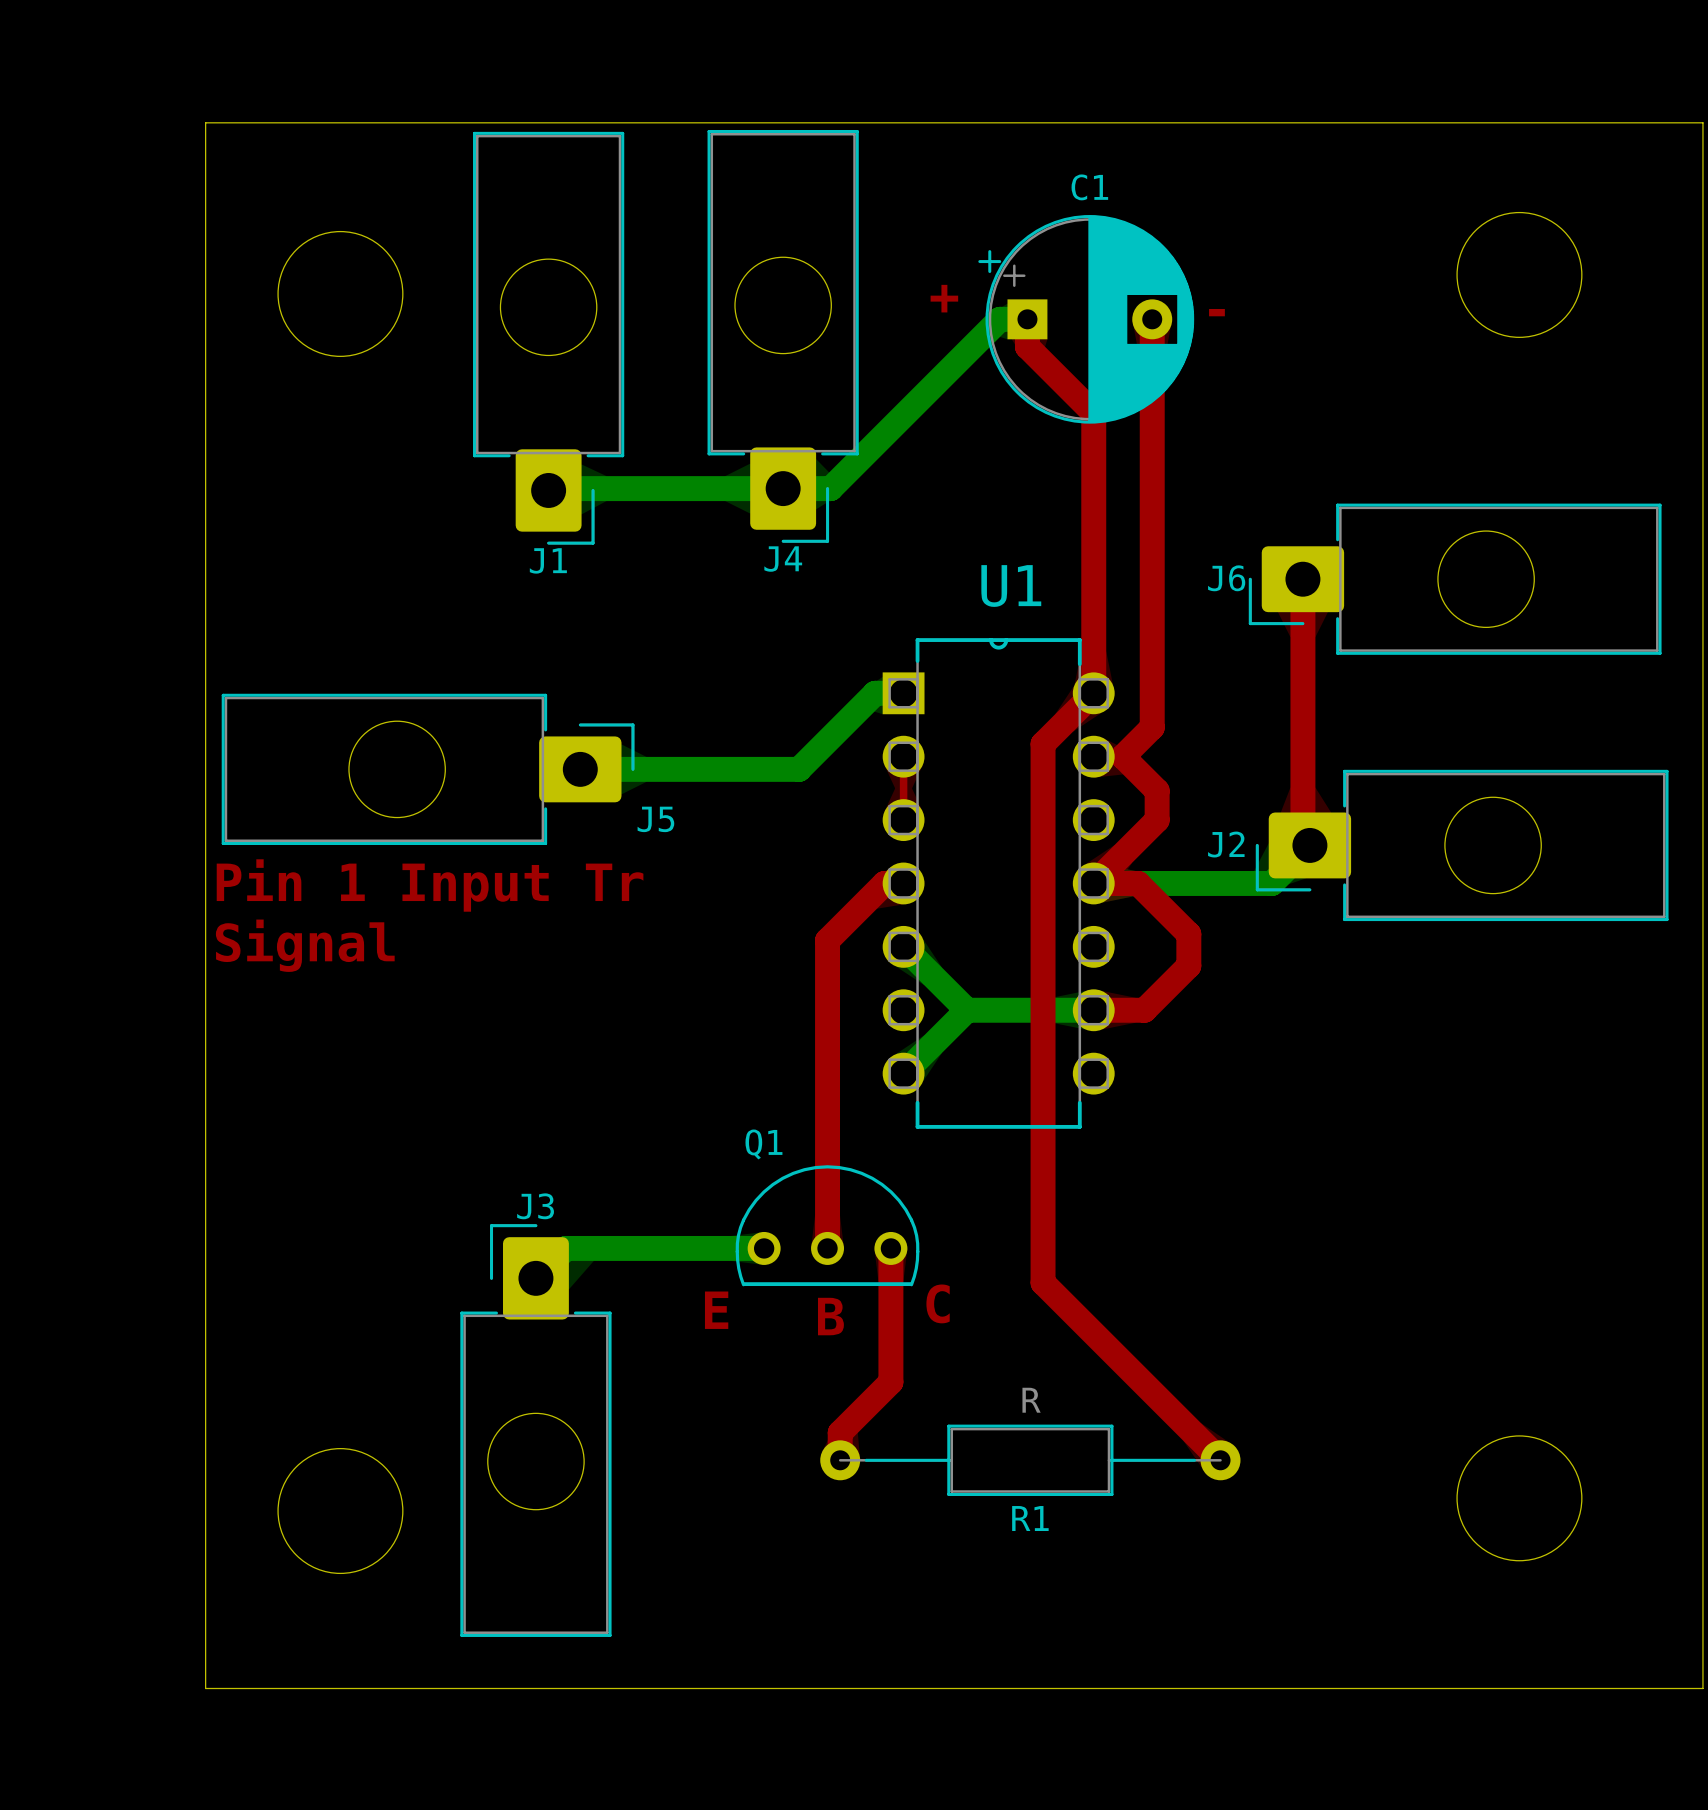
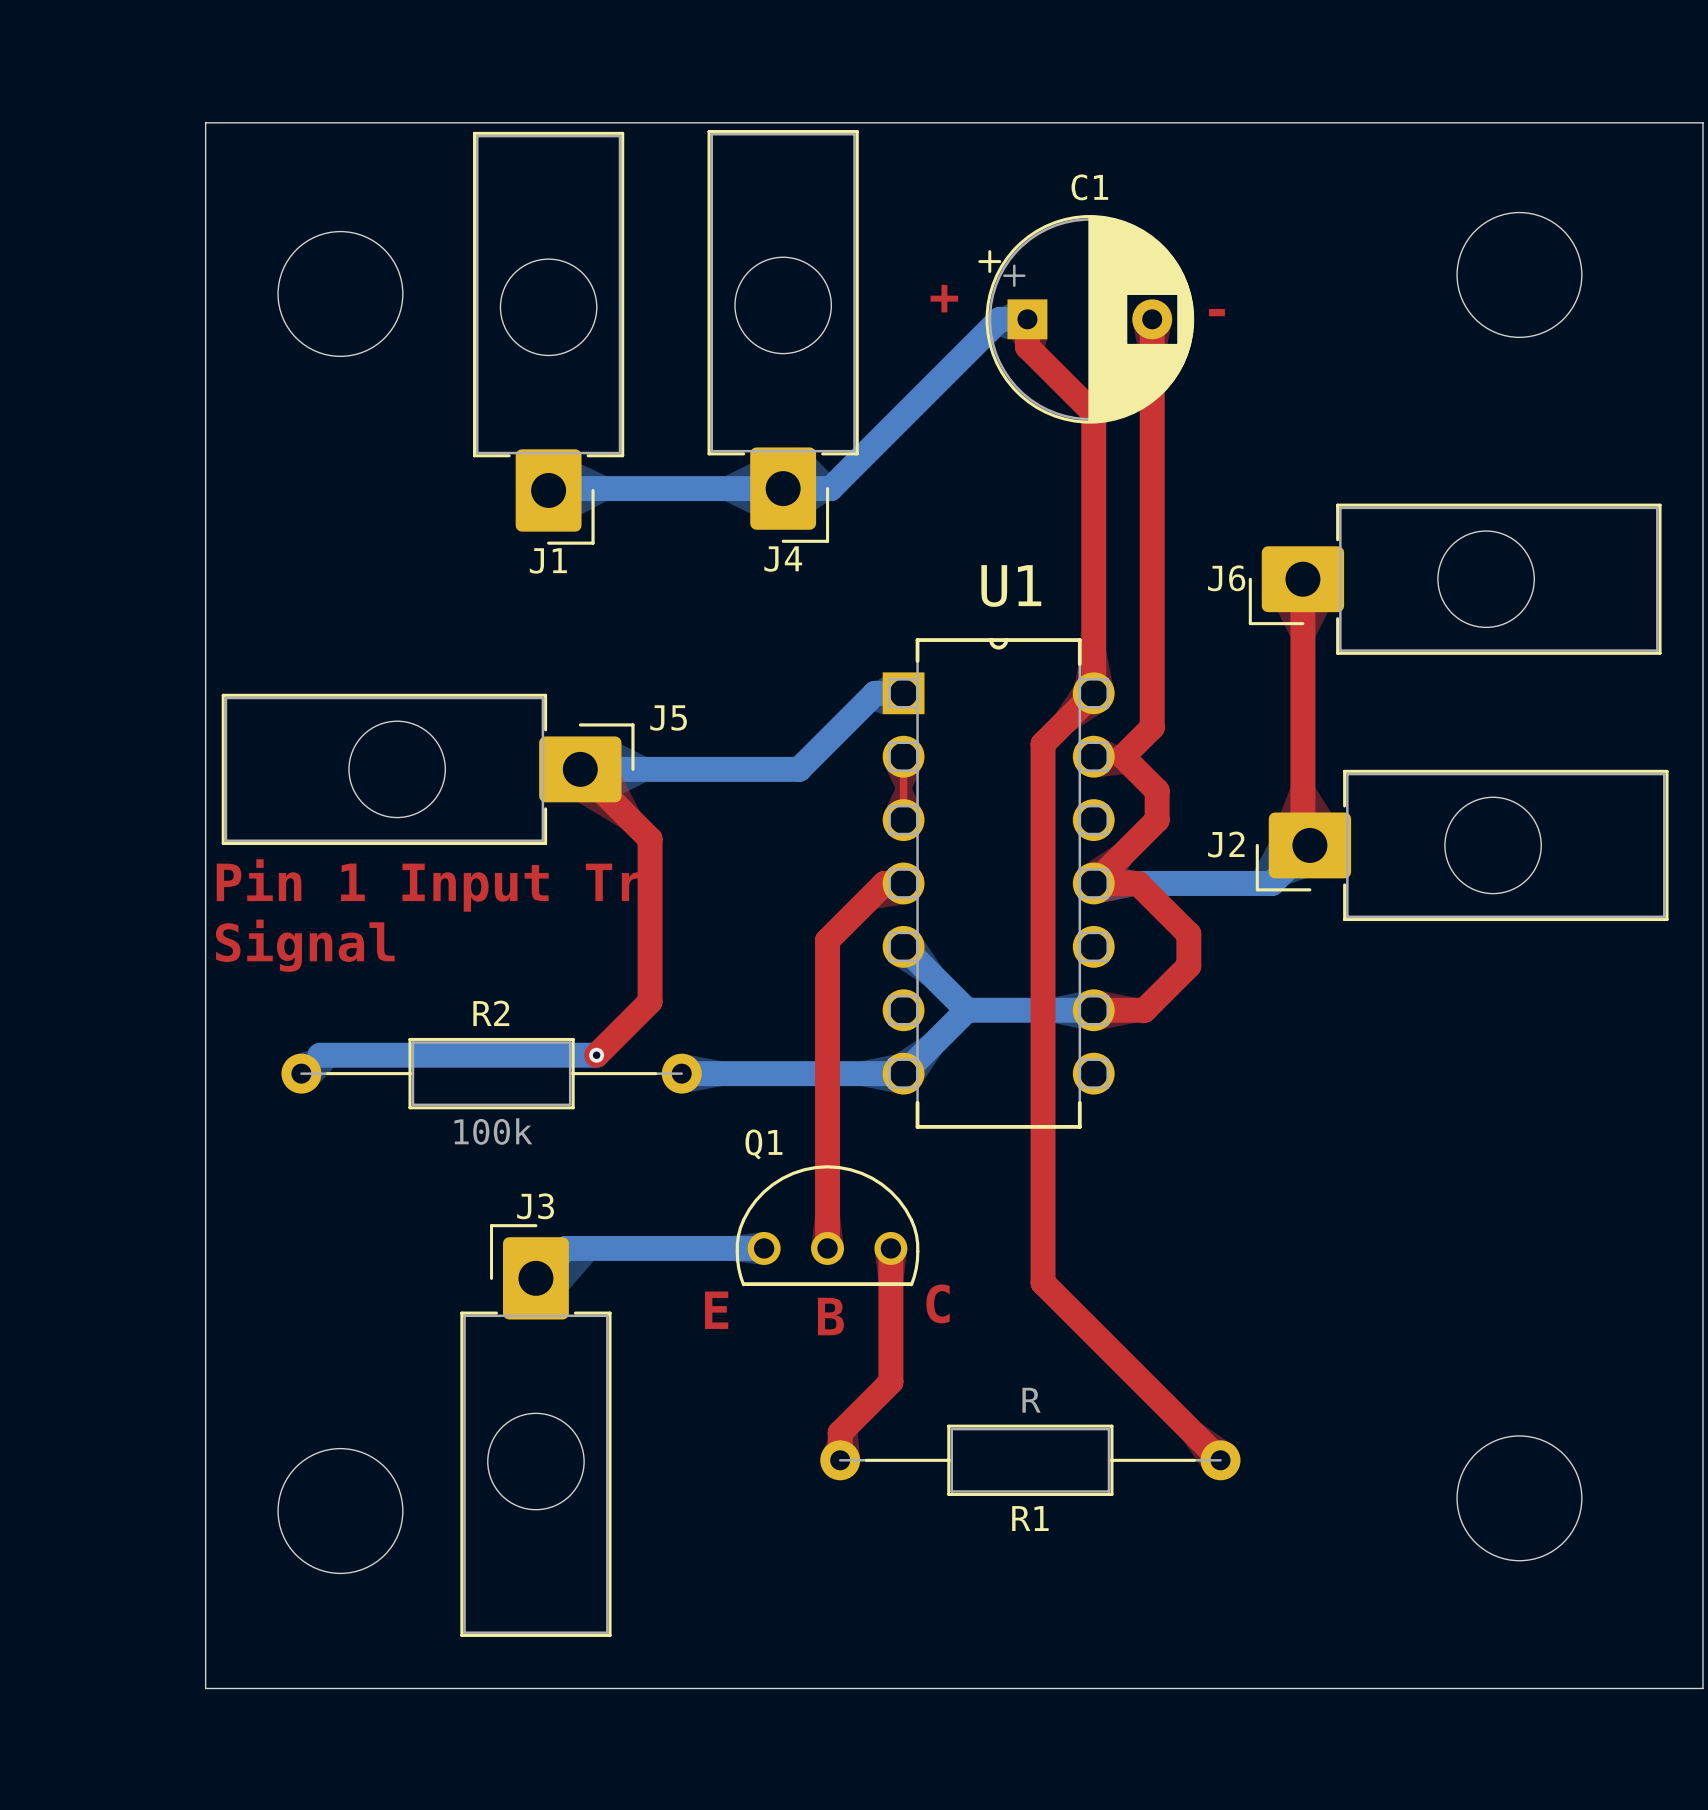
top track: none -> (580, 769) (650, 839) (650, 1001) (596, 1055)
J5 name position: J5 (655, 819) -> J5 (668, 717)
bottom track: none -> (596, 1055) (319, 1055) (301, 1073)
via: none -> (596, 1055)
R2: none -> 100k (491, 1073)
bottom track: none -> (681, 1073) (903, 1073)

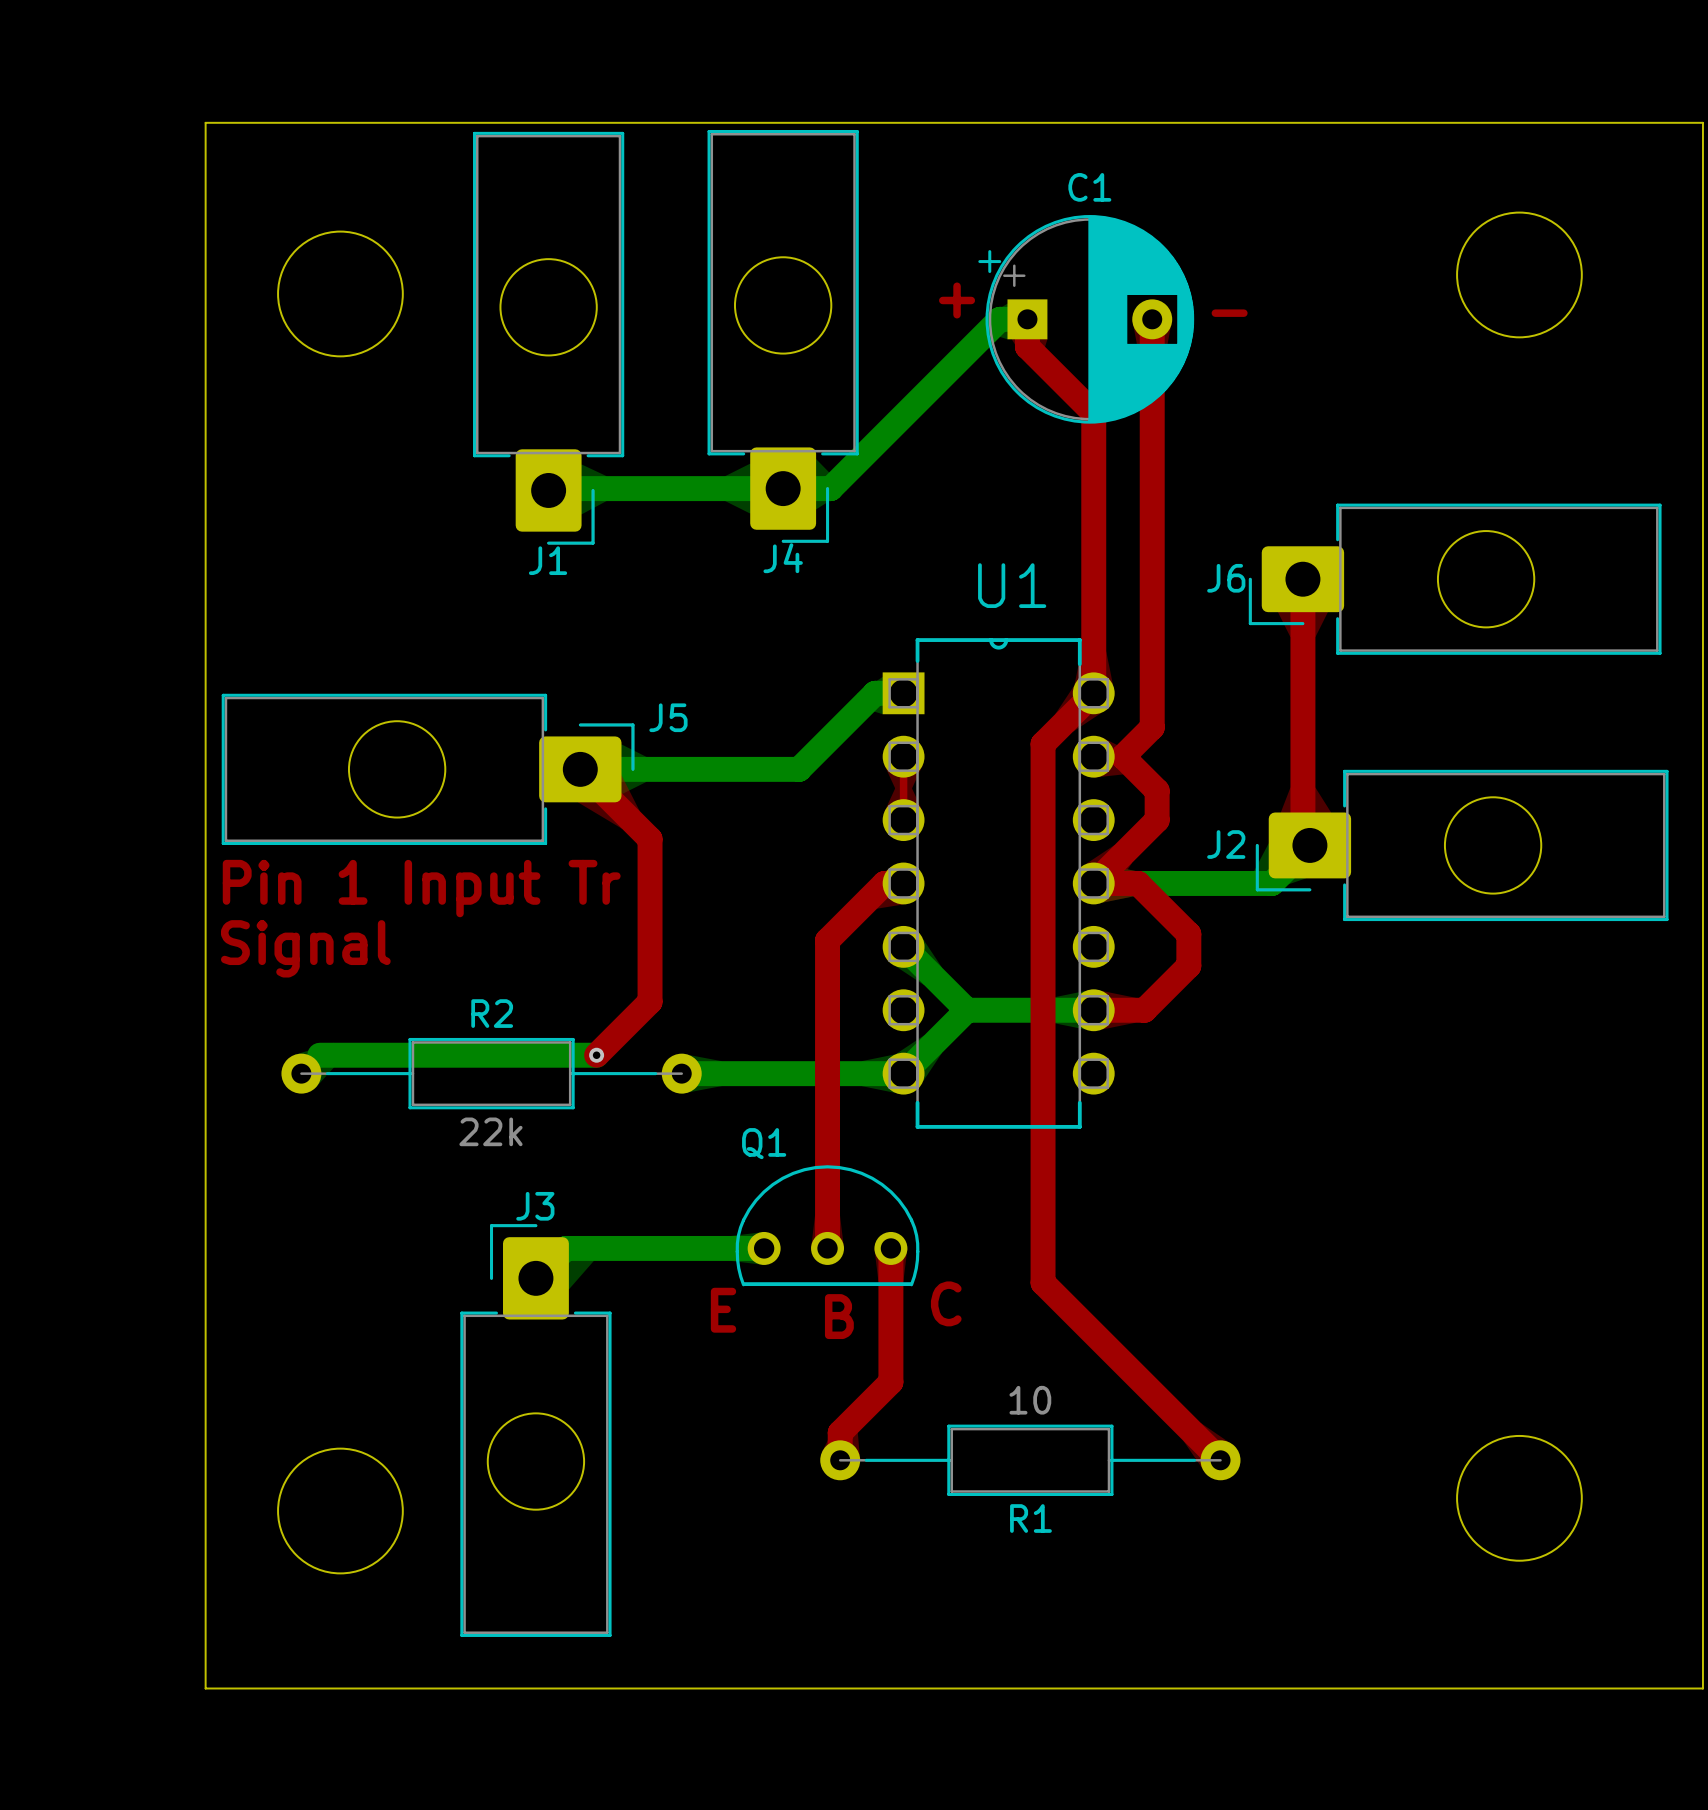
R2 value: 100k (493, 1131) -> 22k (490, 1131)
R1 value: R (1031, 1400) -> 10 (1030, 1400)

